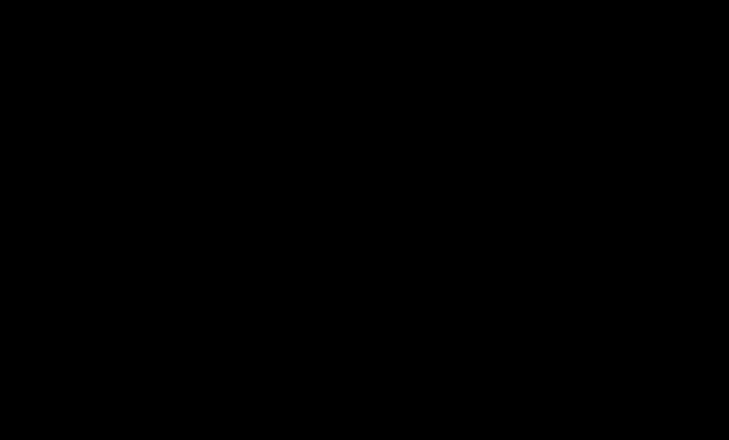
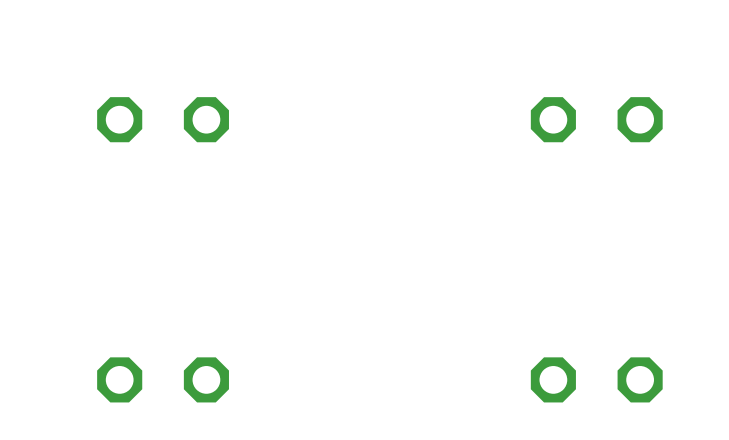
part: none -> (163, 119)
part: none -> (596, 119)
part: none -> (163, 379)
part: none -> (596, 379)

